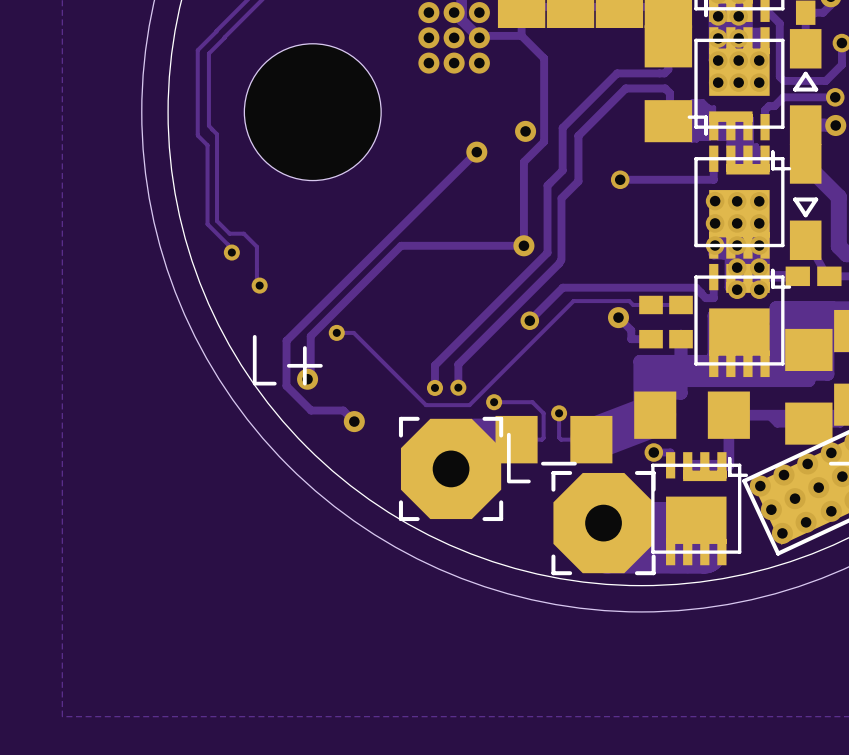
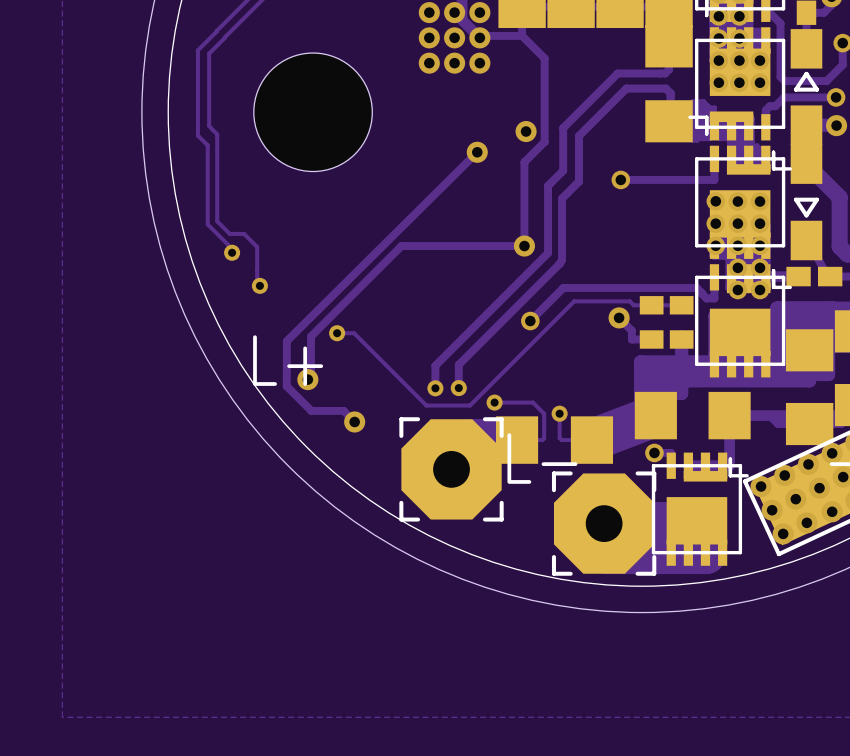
hole size: [244, 43, 382, 181] -> [253, 53, 373, 172]

